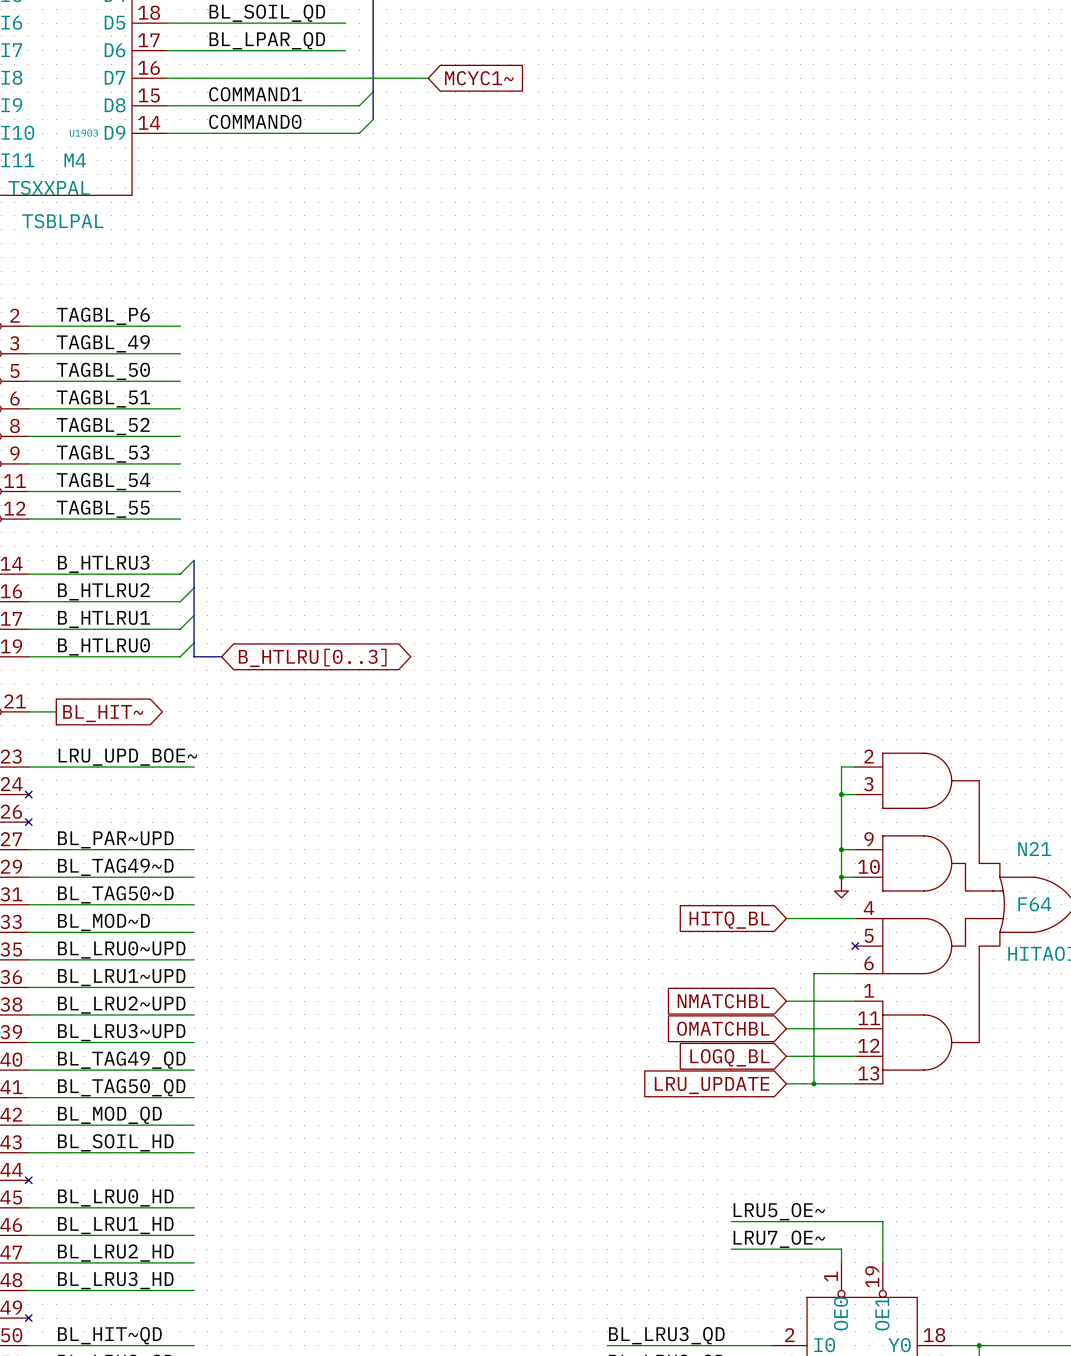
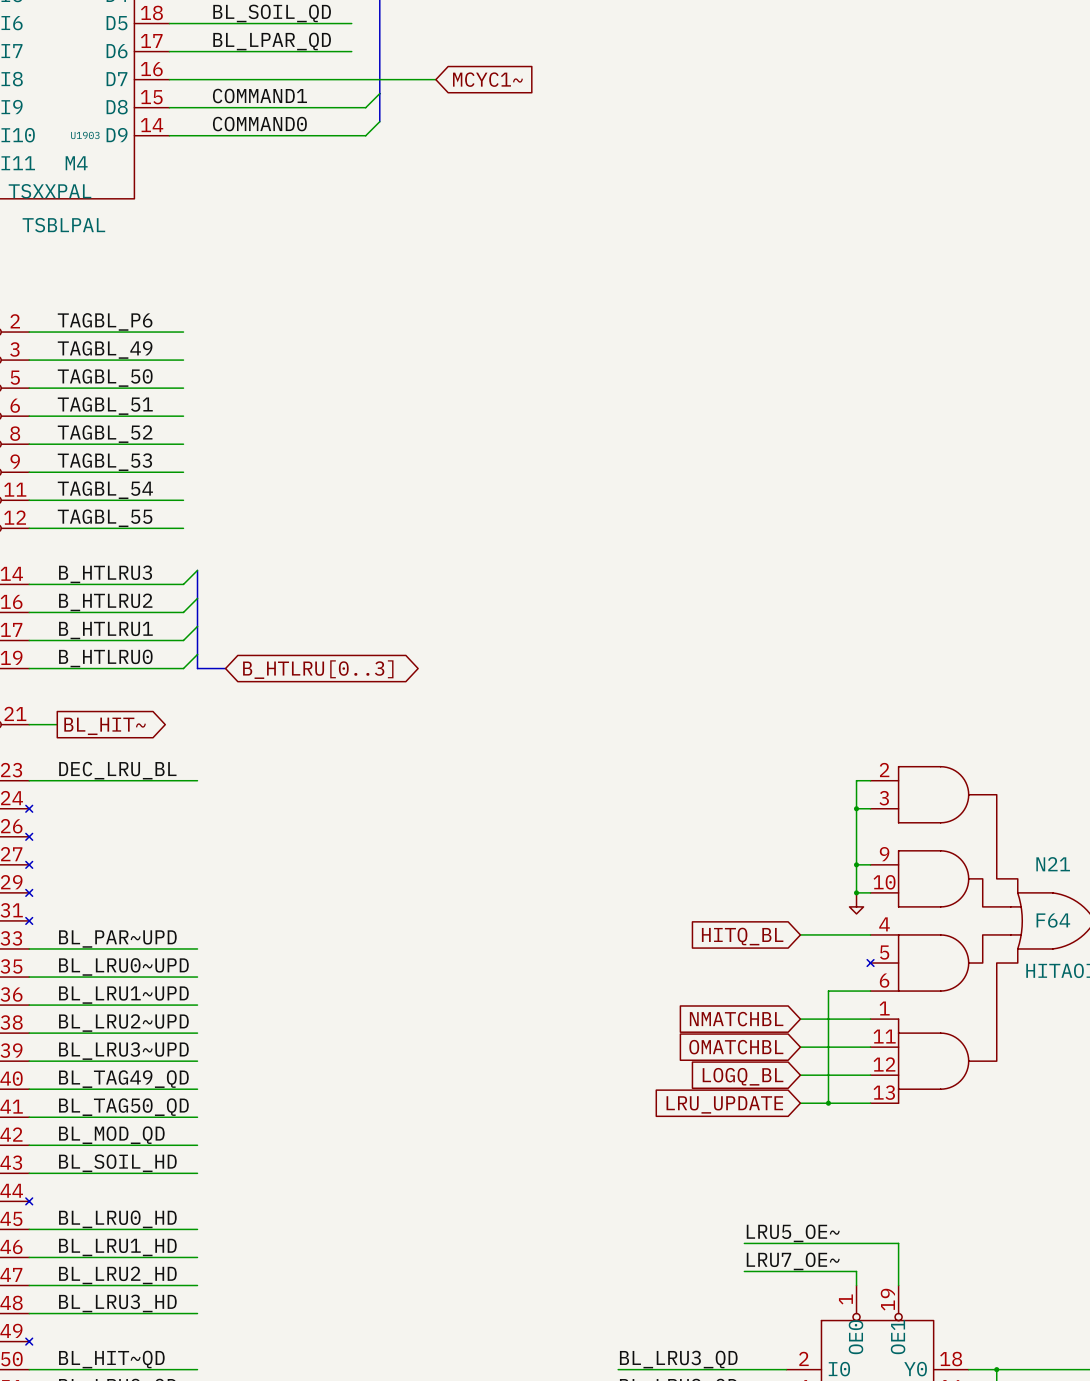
label: LRU_UPD_BOE~ (128, 757) -> DEC_LRU_BL (117, 770)
label: BL_PAR~UPD (115, 839) -> none
wire: (28, 849) (194, 849) -> none
no-connect mark: none -> (29, 864)
label: BL_TAG49~D (115, 867) -> none
wire: (28, 877) (194, 877) -> none
no-connect mark: none -> (29, 892)
label: BL_TAG50~D (115, 894) -> none
wire: (28, 904) (194, 904) -> none
no-connect mark: none -> (29, 920)
label: BL_MOD~D (103, 922) -> BL_PAR~UPD (117, 939)

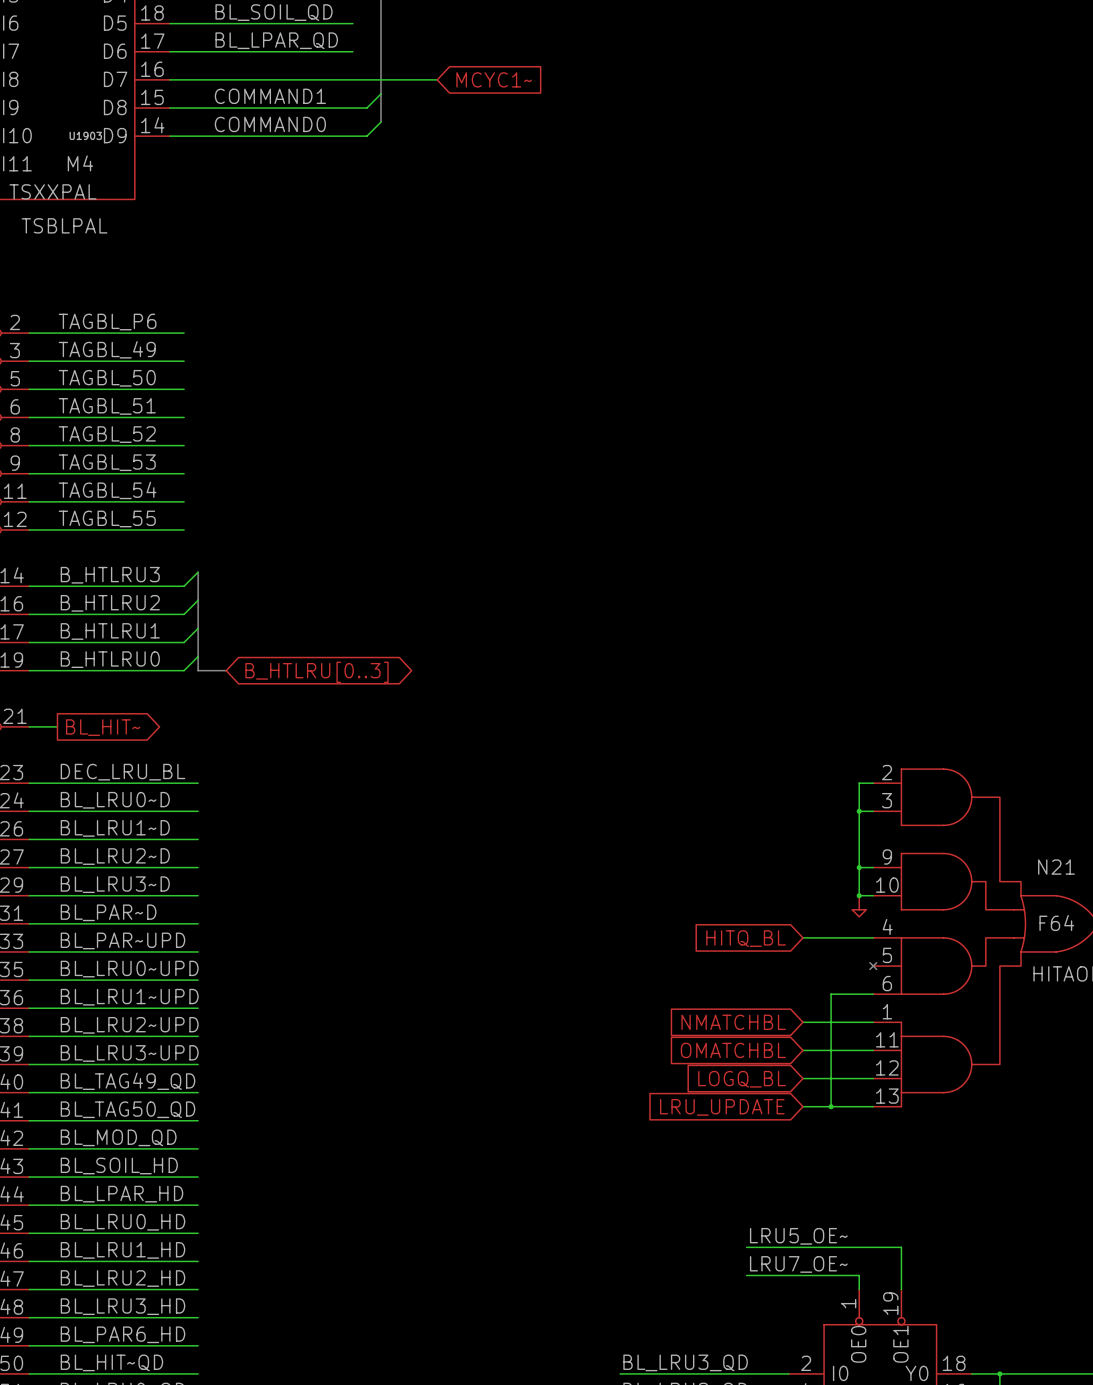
label: none -> BL_LRU0~D (115, 800)
wire: none -> (29, 811) (198, 811)
no-connect mark: (29, 808) -> none
label: none -> BL_LRU1~D (115, 828)
wire: none -> (29, 839) (198, 839)
no-connect mark: (29, 836) -> none
label: none -> BL_LRU2~D (115, 856)
wire: none -> (29, 867) (198, 867)
no-connect mark: (29, 864) -> none
label: none -> BL_LRU3~D (115, 884)
wire: none -> (29, 895) (198, 895)
no-connect mark: (29, 892) -> none
label: none -> BL_PAR~D (108, 912)
wire: none -> (29, 923) (198, 923)
no-connect mark: (29, 920) -> none
label: none -> BL_LPAR_HD (121, 1194)
wire: none -> (29, 1205) (198, 1205)
no-connect mark: (29, 1201) -> none
label: none -> BL_PAR6_HD (122, 1334)
wire: none -> (29, 1345) (198, 1345)
no-connect mark: (29, 1341) -> none

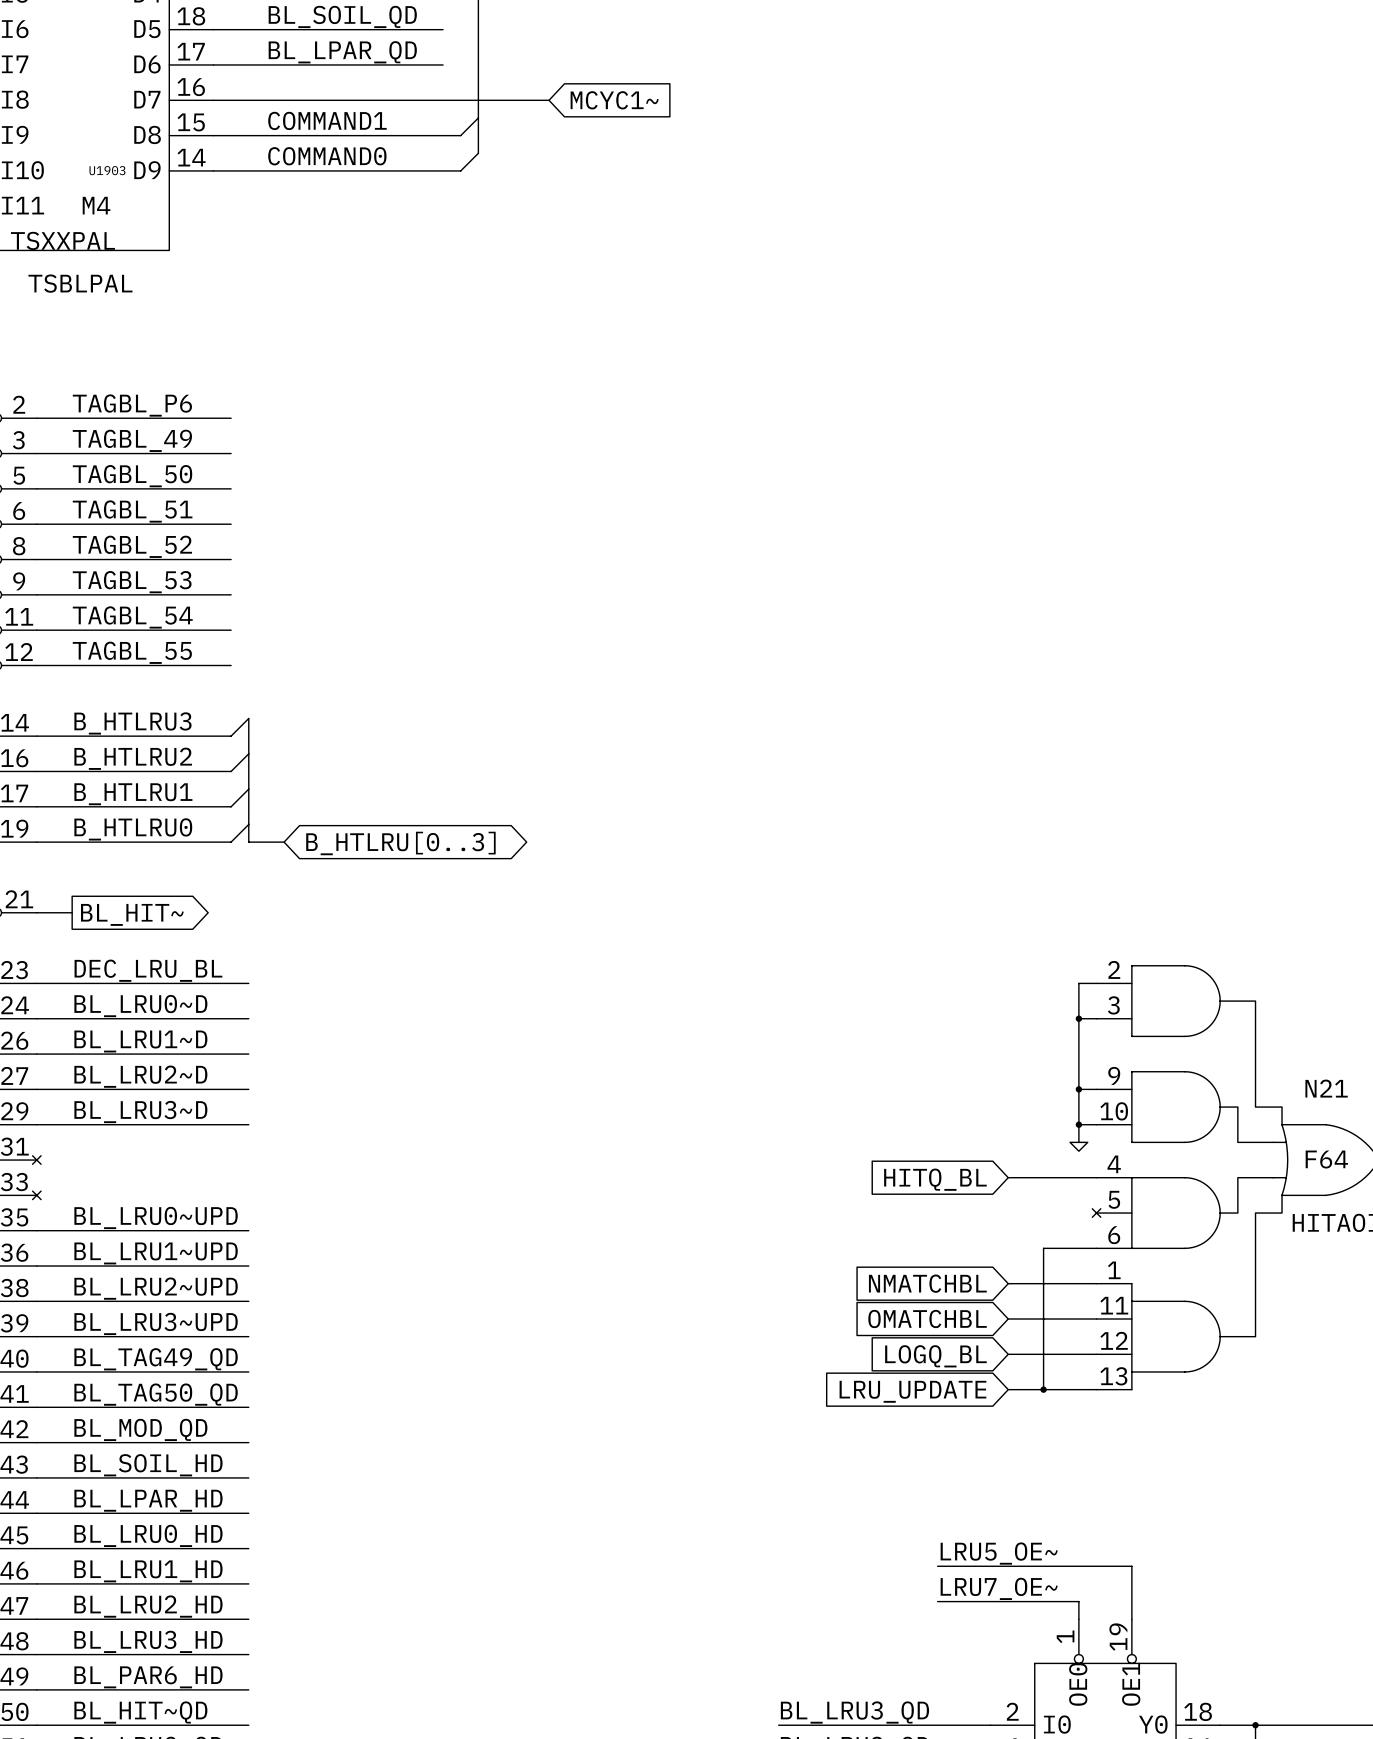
label: BL_PAR~D (108, 912) -> none
wire: (29, 923) (198, 923) -> none
no-connect mark: none -> (36, 1160)
label: BL_PAR~UPD (122, 940) -> none
wire: (29, 951) (198, 951) -> none
no-connect mark: none -> (36, 1195)

